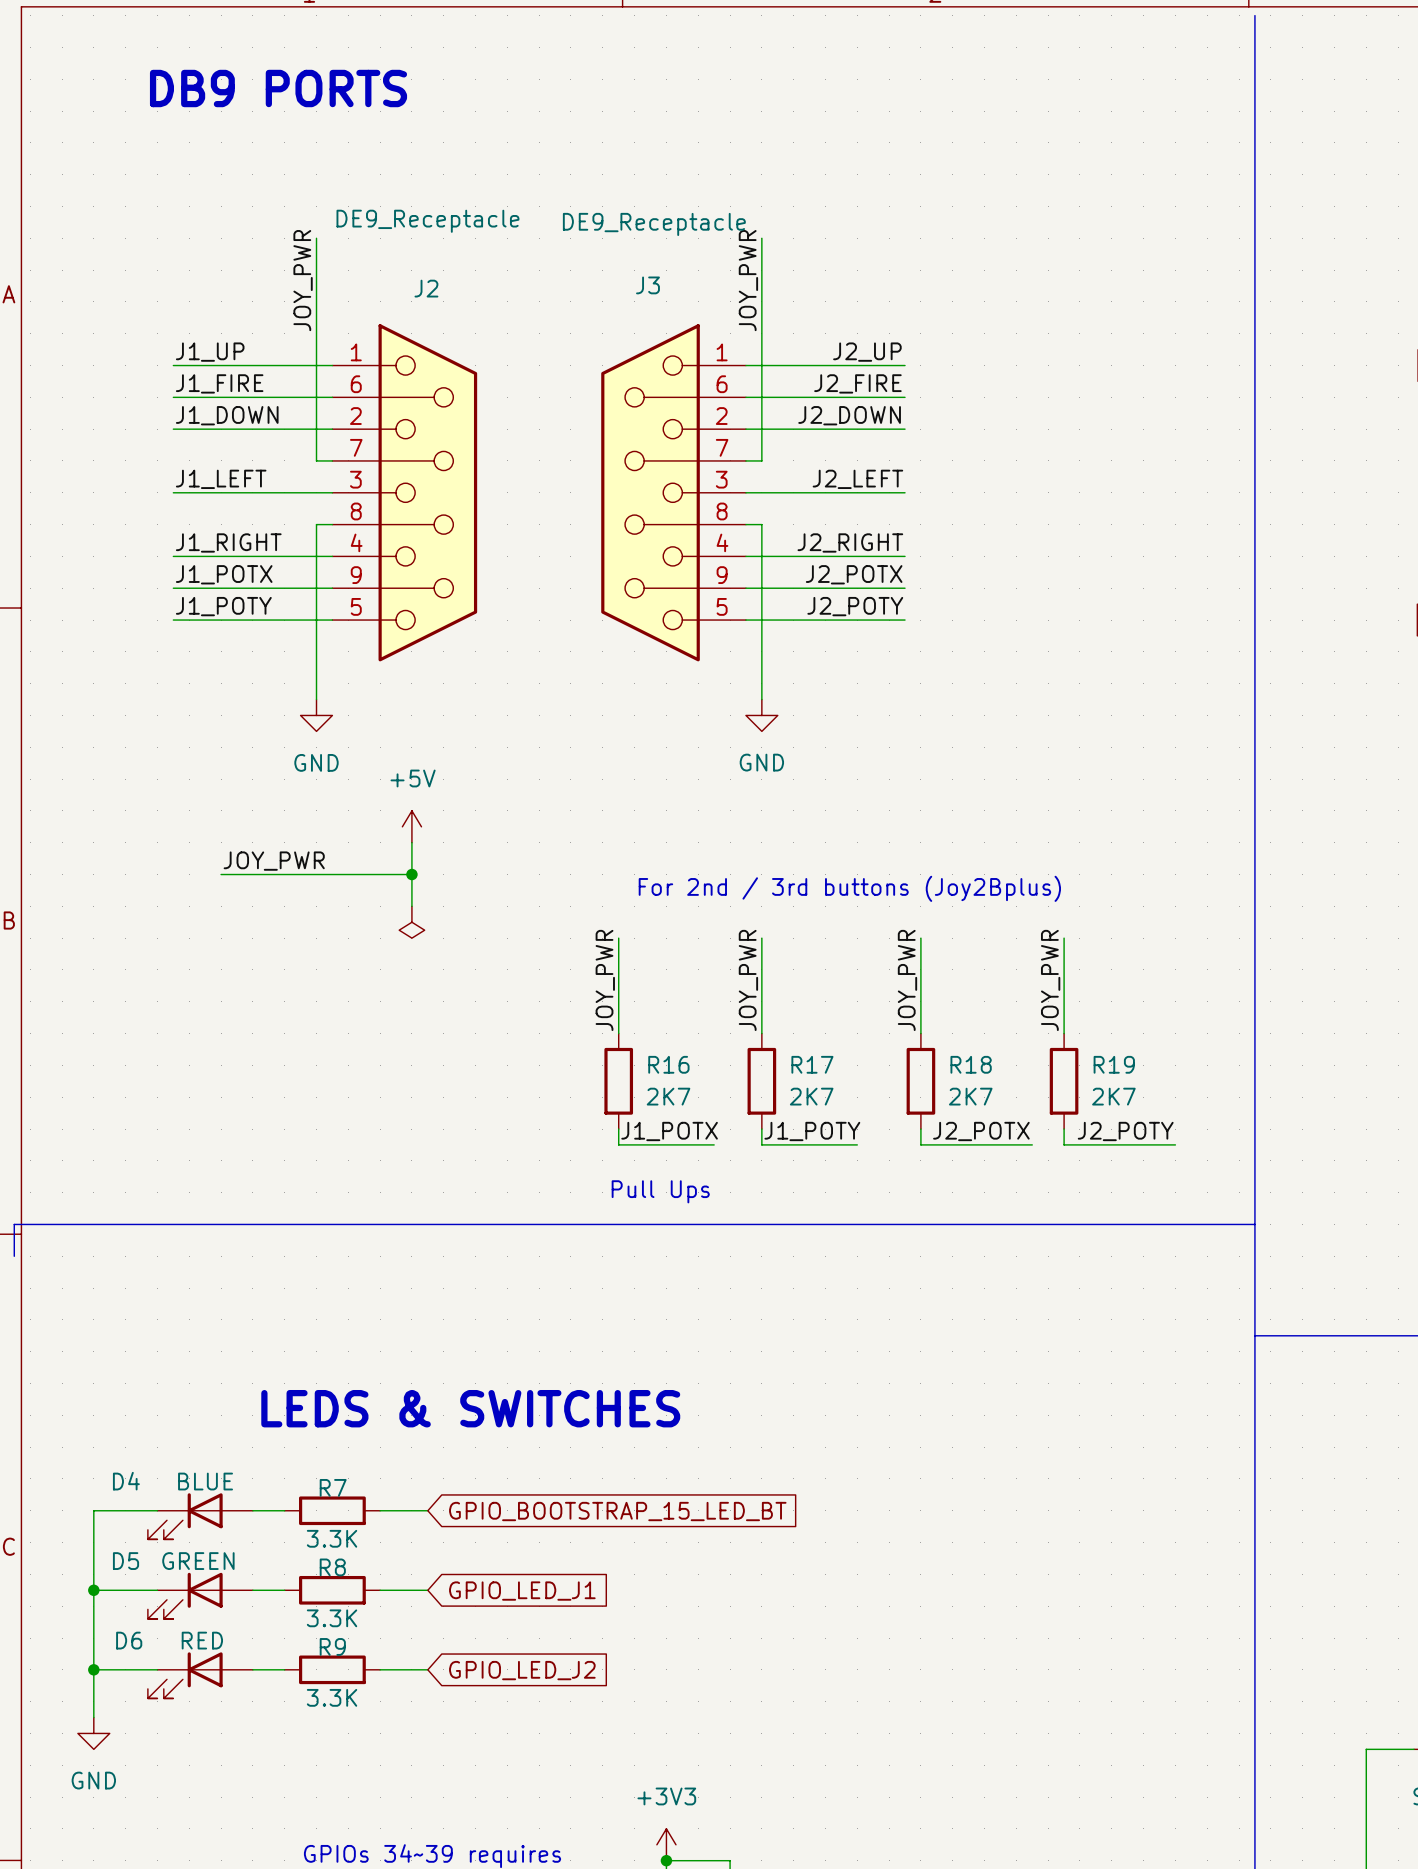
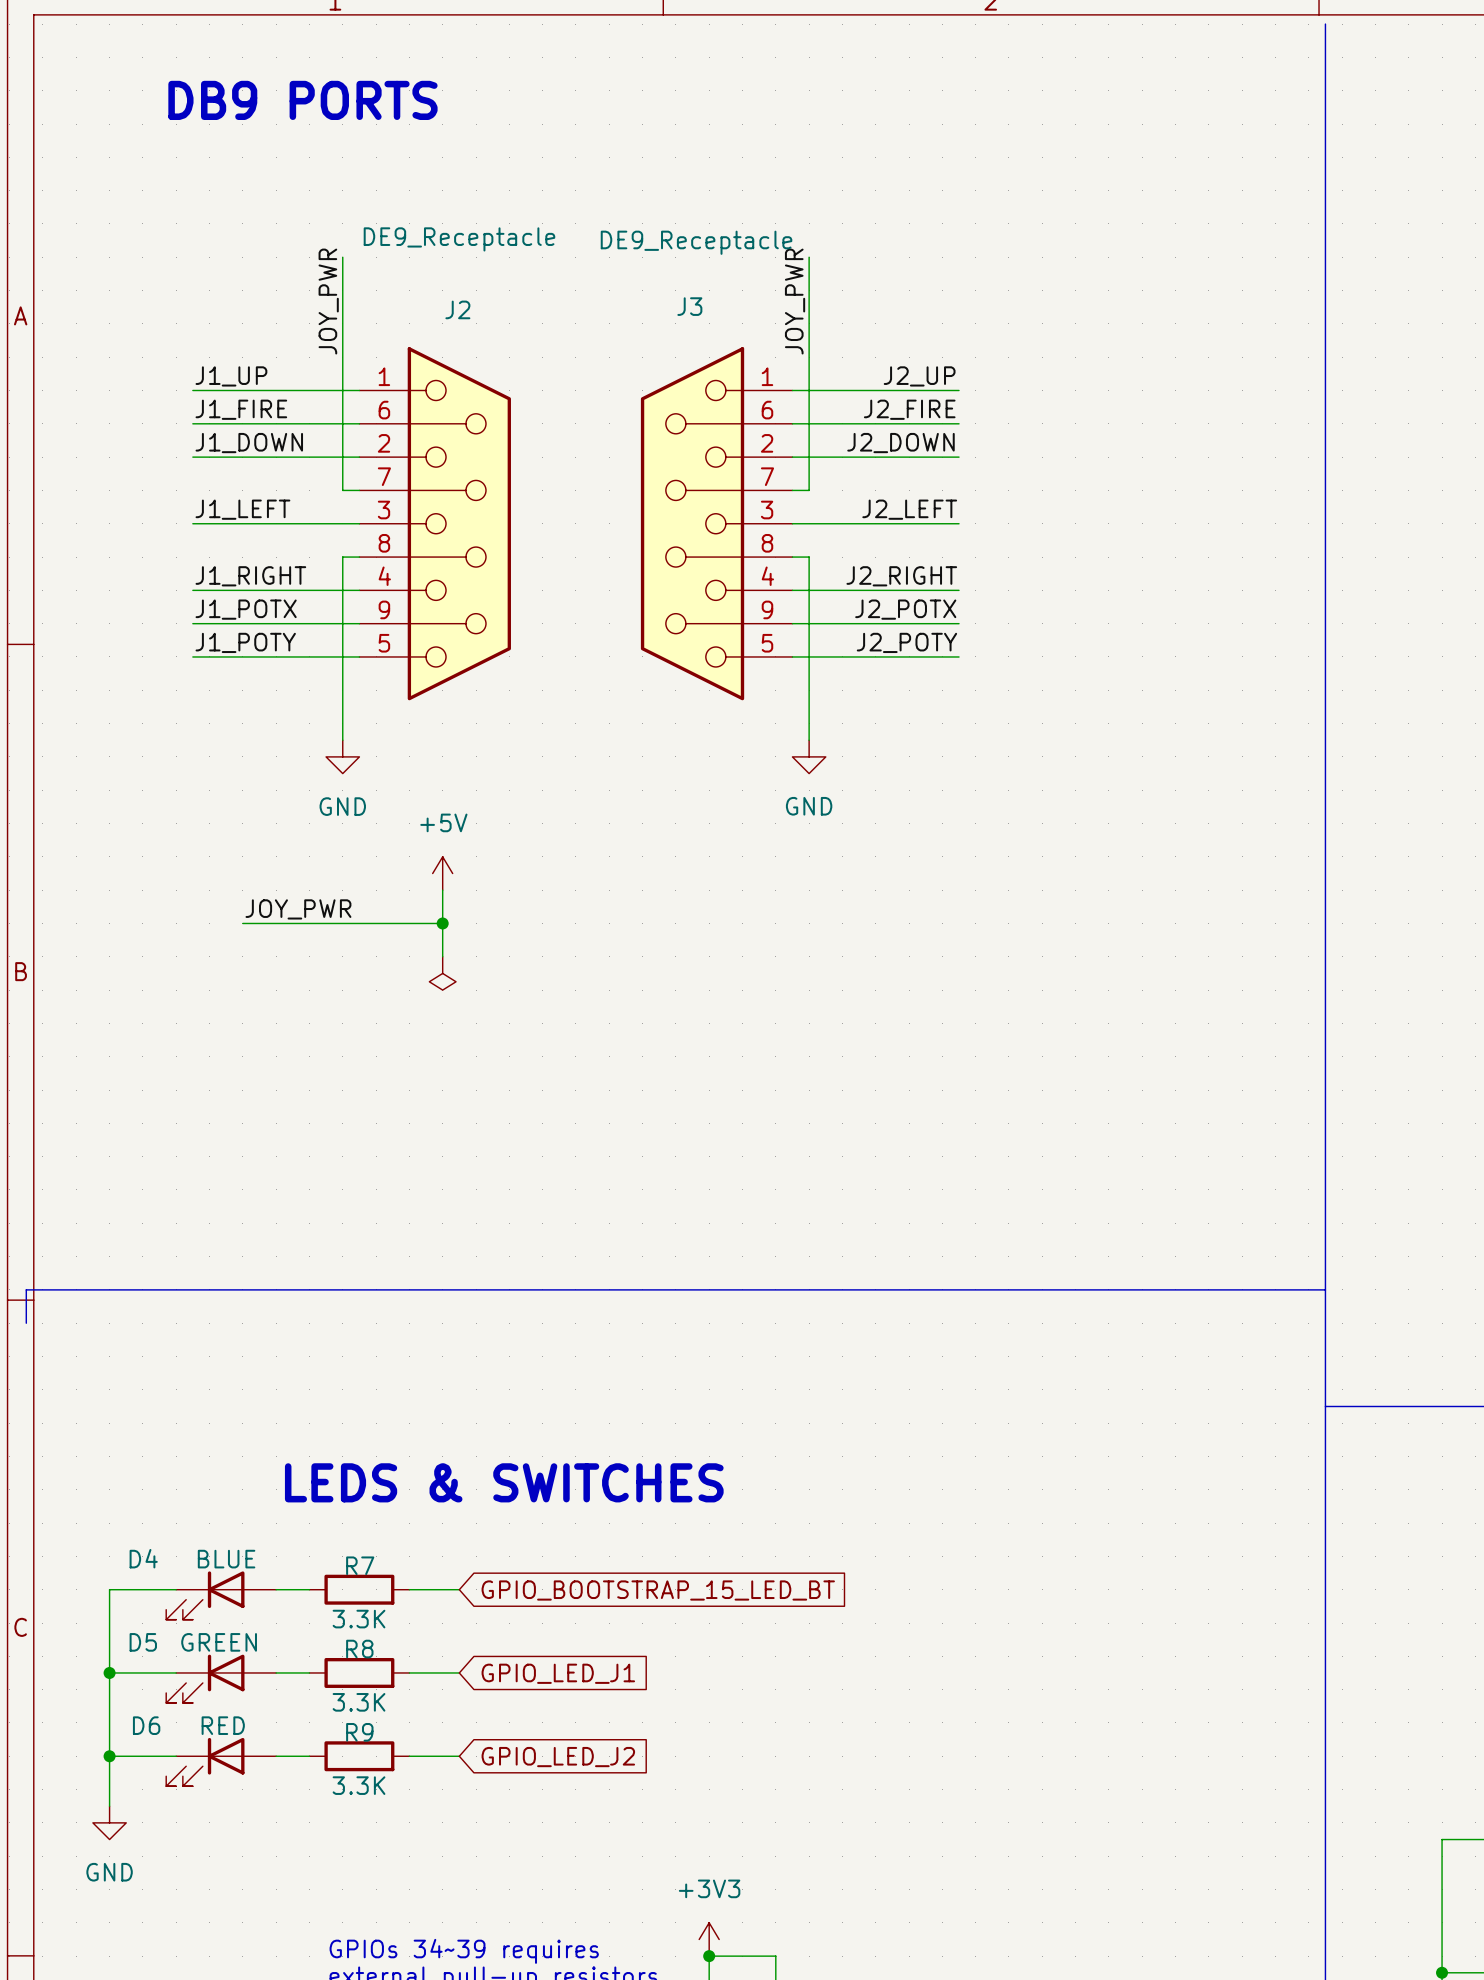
text: For 2nd / 3rd buttons (Joy2Bplus) (849, 888) -> none
wire: (618, 938) (618, 1033) -> none
wire: (761, 938) (761, 1033) -> none
wire: (920, 938) (920, 1033) -> none
wire: (1064, 938) (1064, 1033) -> none
label: JOY_PWR (605, 980) -> none
label: JOY_PWR (748, 980) -> none
label: JOY_PWR (907, 980) -> none
label: JOY_PWR (1050, 980) -> none
R16: 2K7 (618, 1081) -> none
R17: 2K7 (761, 1081) -> none
R18: 2K7 (920, 1081) -> none
R19: 2K7 (1064, 1081) -> none
wire: (618, 1129) (618, 1144) (714, 1144) -> none
wire: (761, 1129) (761, 1144) (857, 1144) -> none
wire: (920, 1129) (920, 1144) (1032, 1144) -> none
wire: (1064, 1129) (1064, 1144) (1175, 1144) -> none
label: J1_POTX (669, 1131) -> none
label: J1_POTY (812, 1131) -> none
label: J2_POTX (981, 1131) -> none
label: J2_POTY (1125, 1131) -> none
text: Pull Ups (660, 1191) -> none

